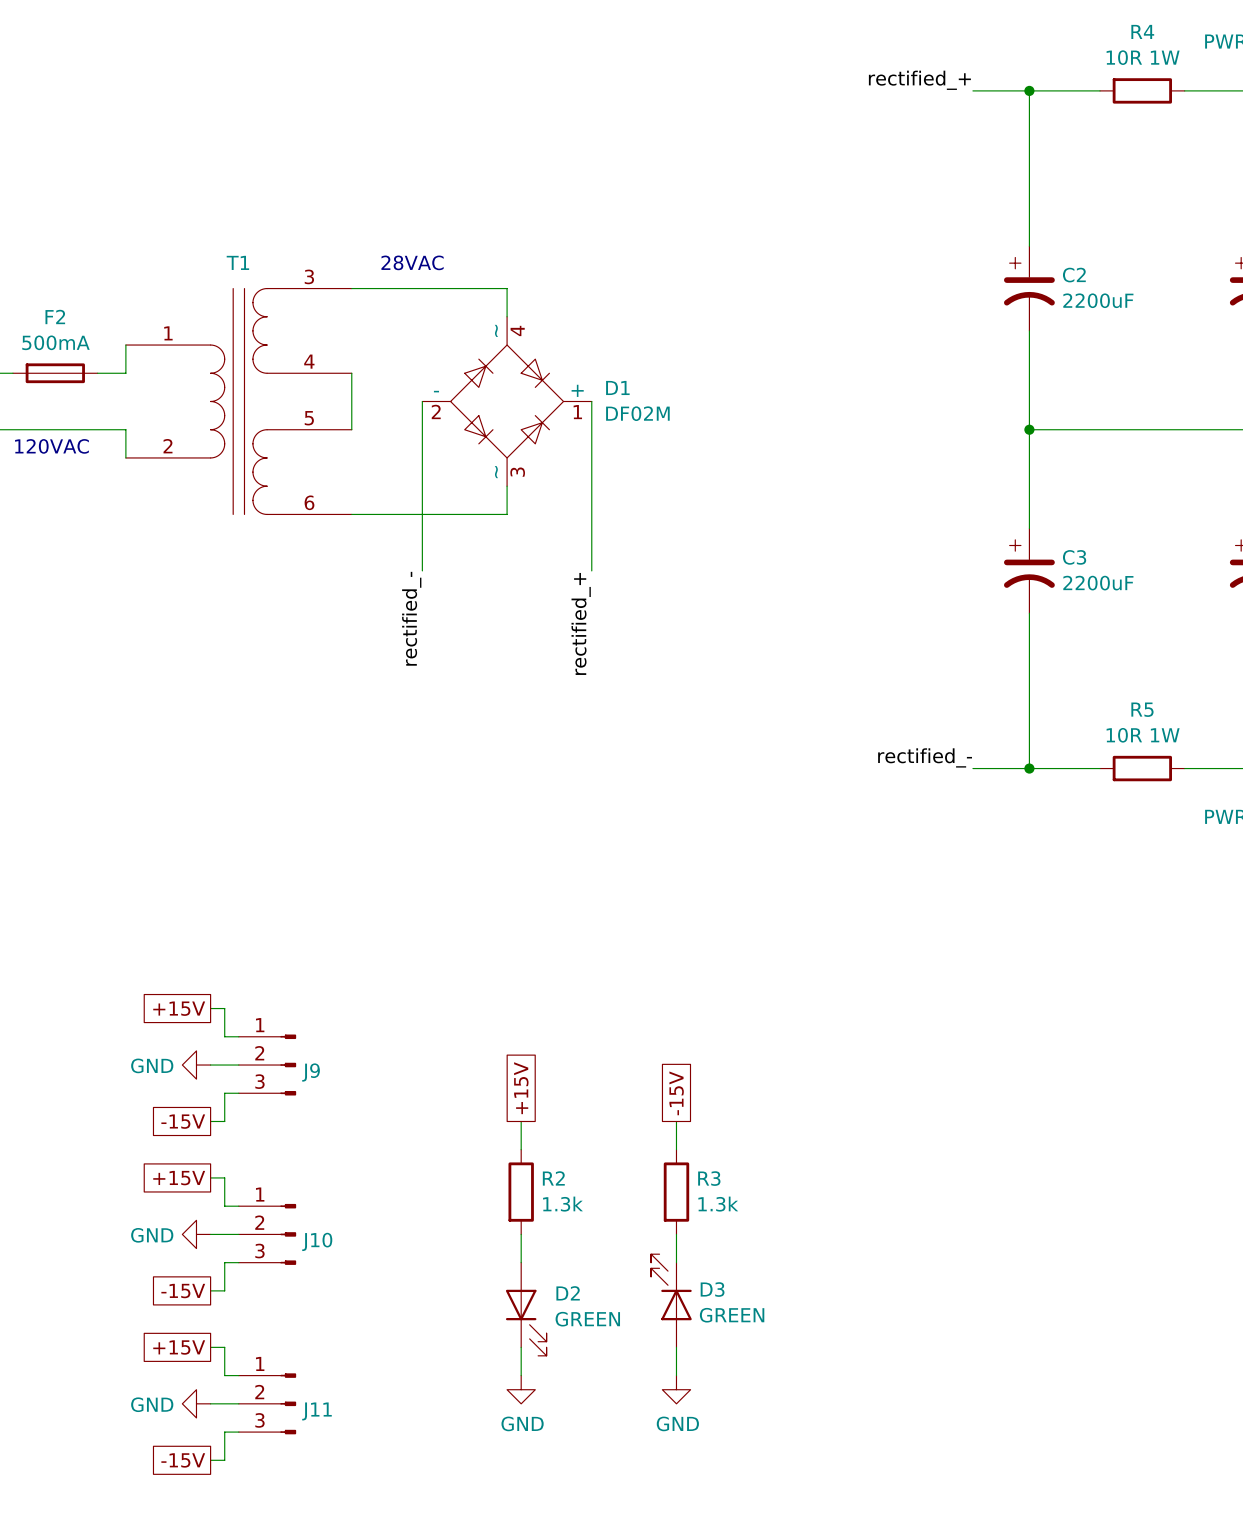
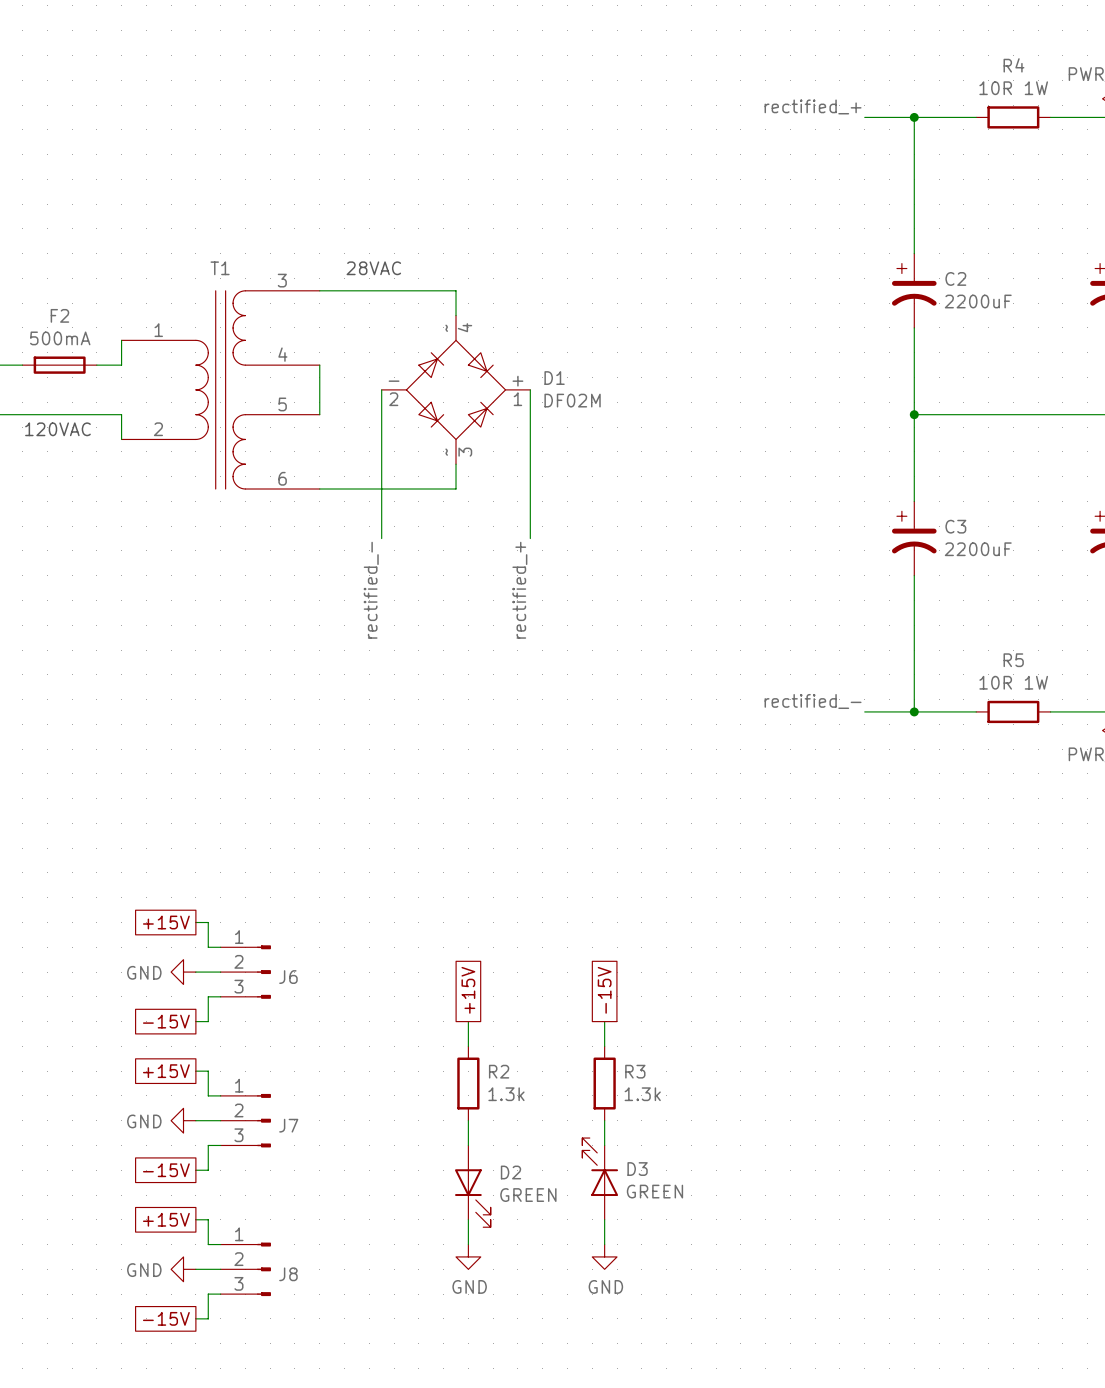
J9 name: J9 (311, 1072) -> J6 (288, 977)
J10 name: J10 (317, 1241) -> J7 (288, 1125)
J11 name: J11 (316, 1411) -> J8 (288, 1274)

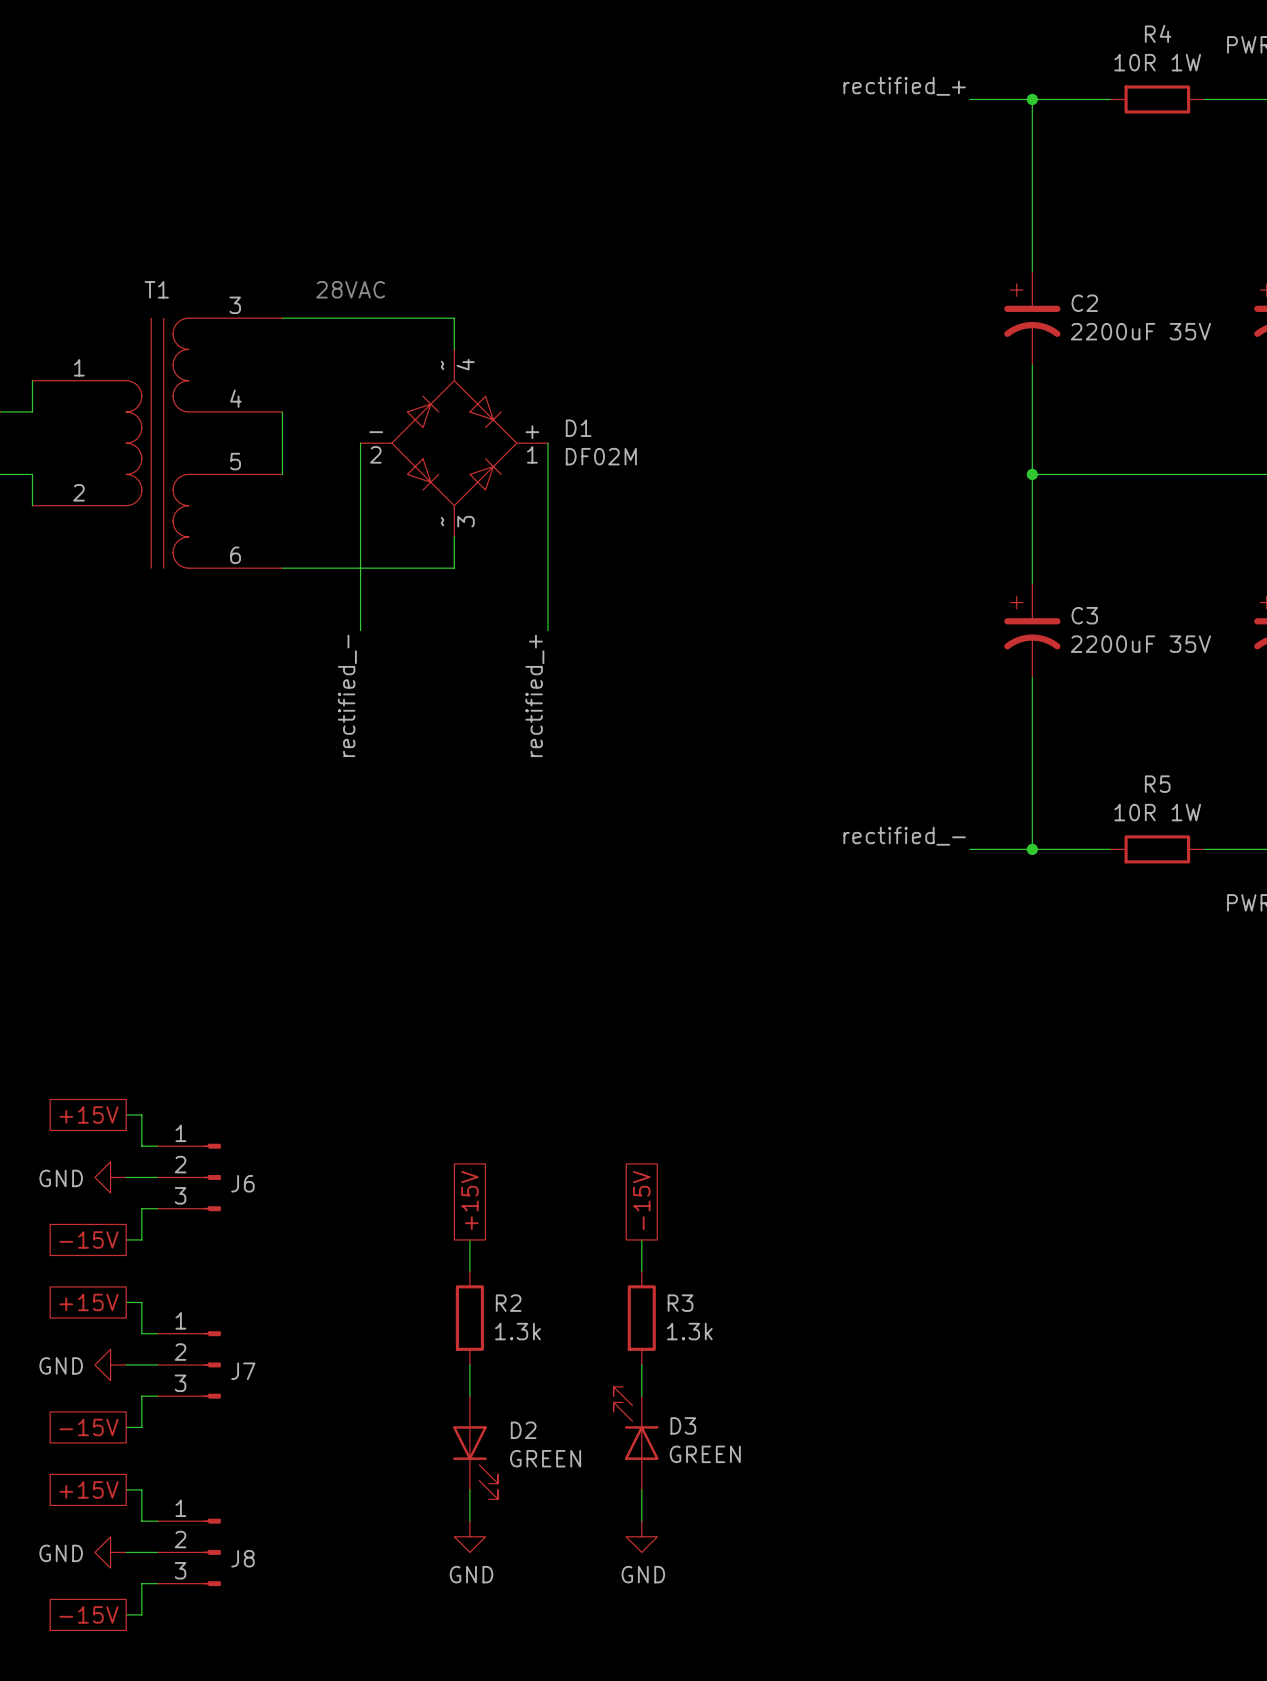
C2 value: 2200uF (978, 301) -> 2200uF 35V (1140, 331)
C3 value: 2200uF (978, 549) -> 2200uF 35V (1140, 644)

